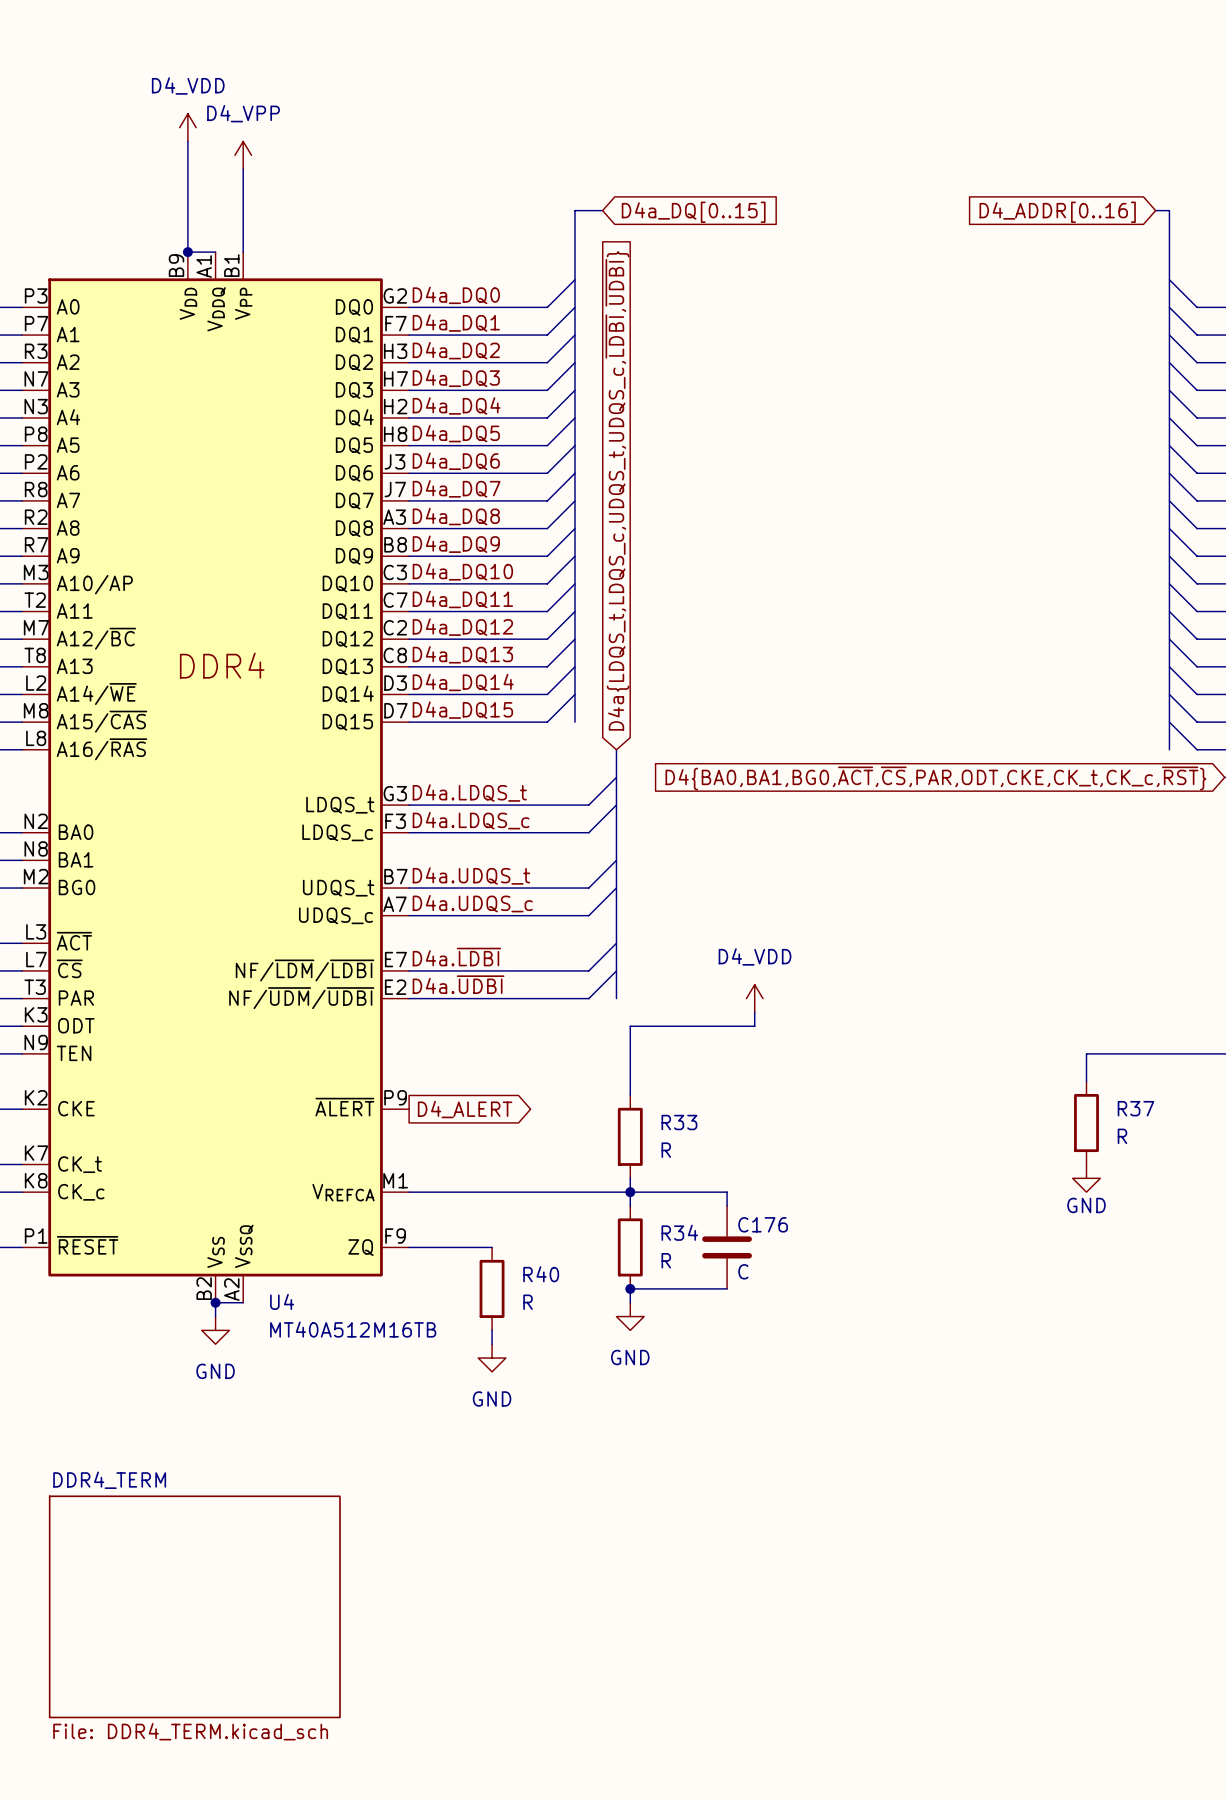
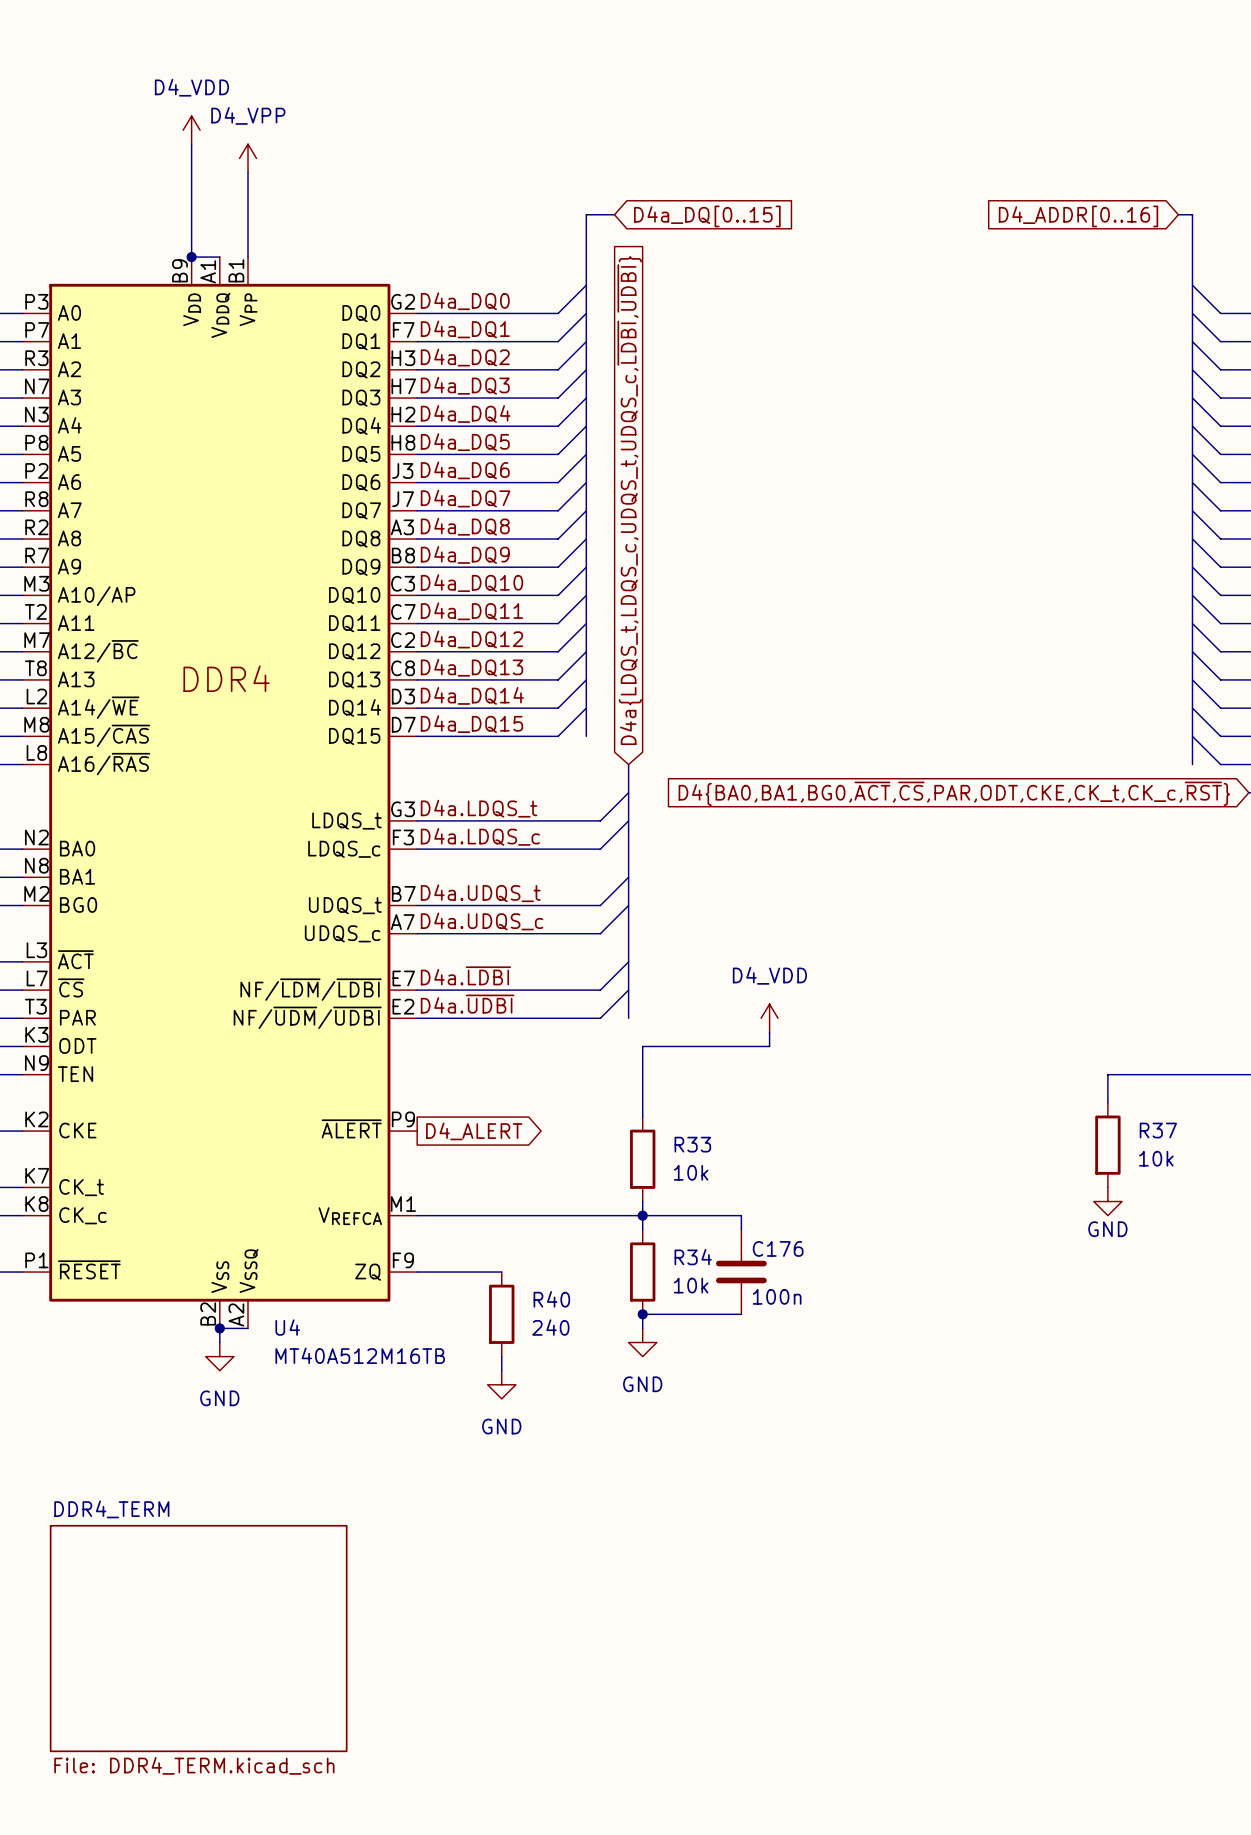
R37 value: R (1122, 1136) -> 10k (1156, 1158)
R33 value: R (666, 1150) -> 10k (691, 1172)
R34 value: R (666, 1260) -> 10k (691, 1285)
C176 value: C (743, 1271) -> 100n (777, 1296)
R40 value: R (528, 1302) -> 240 (550, 1327)

